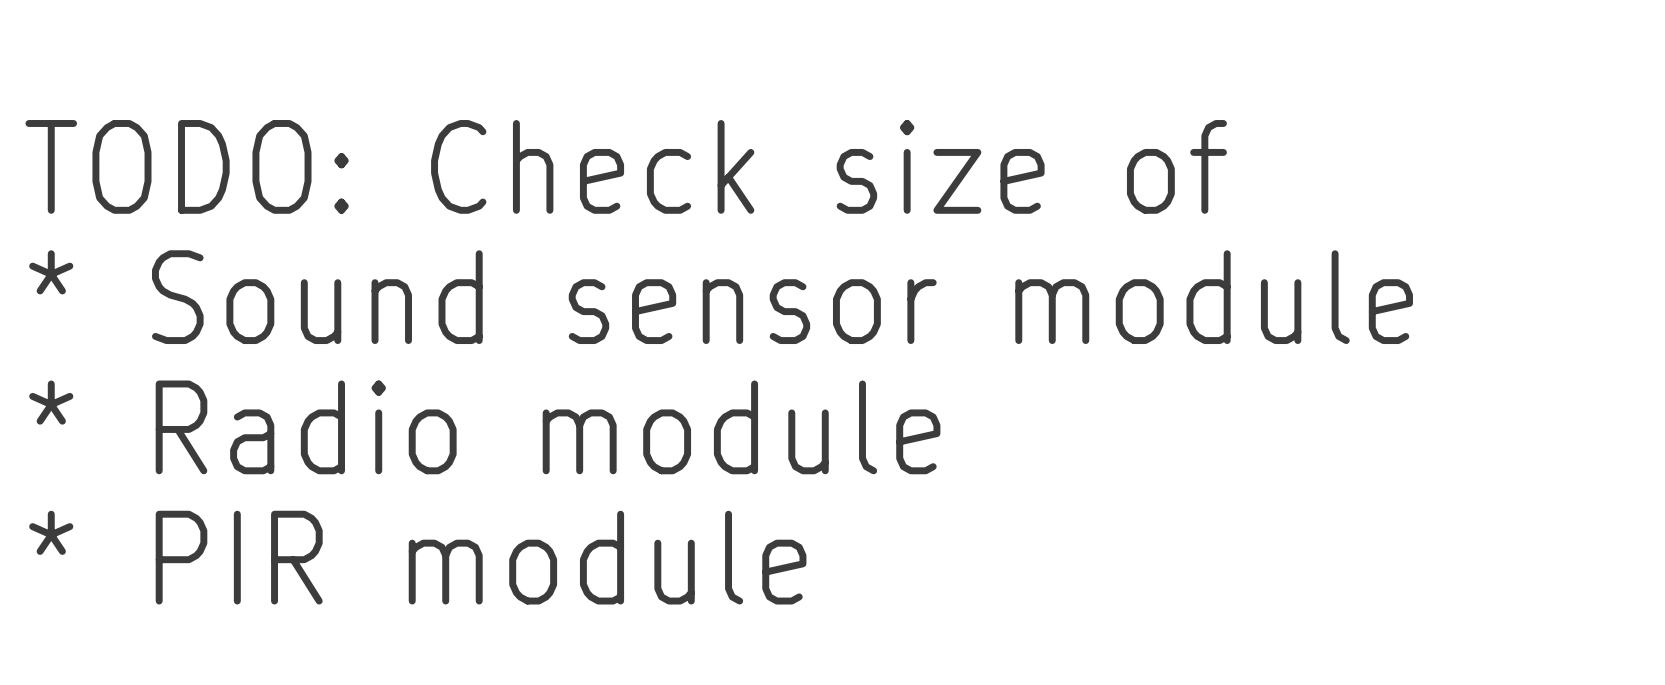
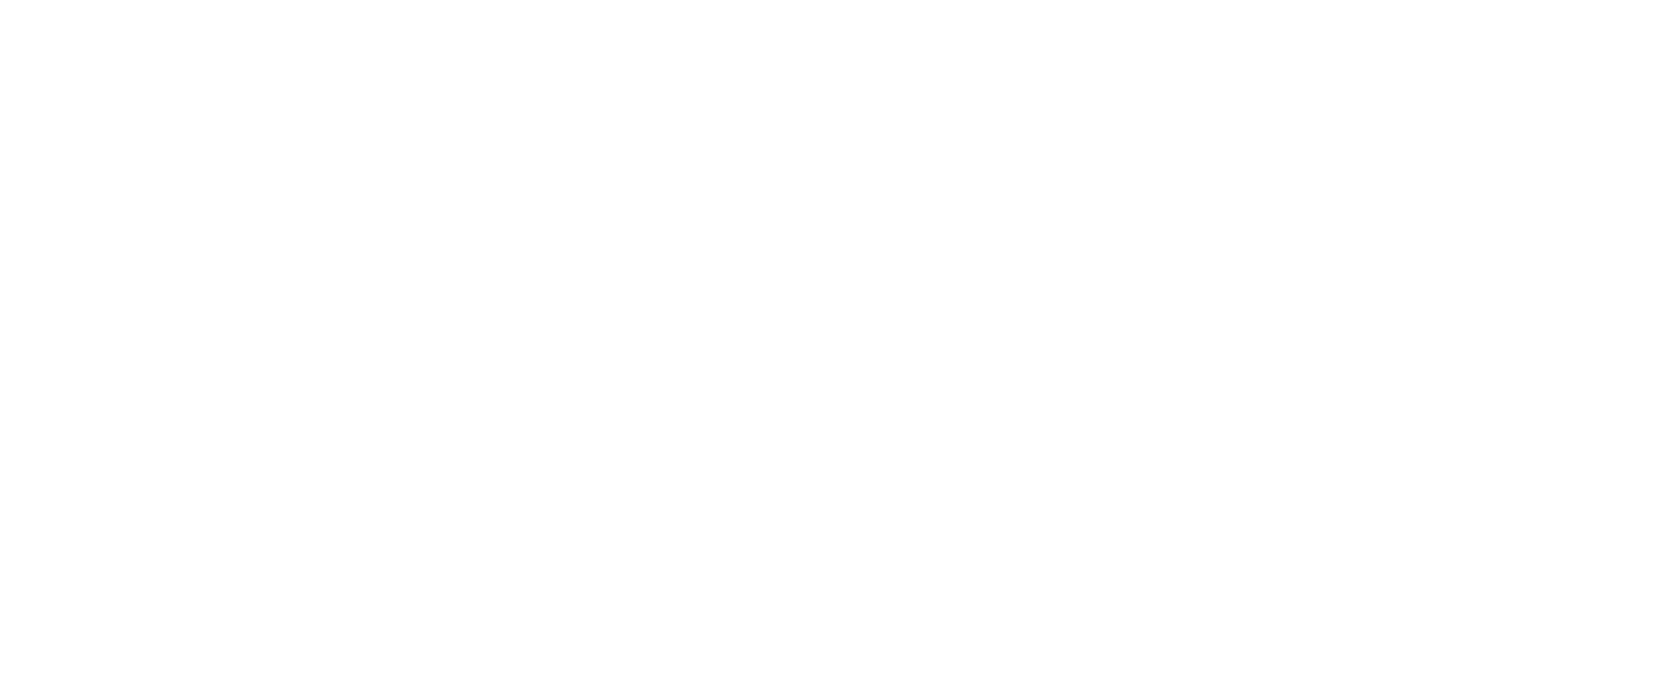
text: TODO: Check size of (626, 166) -> none
text: * Sound sensor module (721, 297) -> none
text: * Radio module (484, 427) -> none
text: * PIR module (417, 557) -> none

